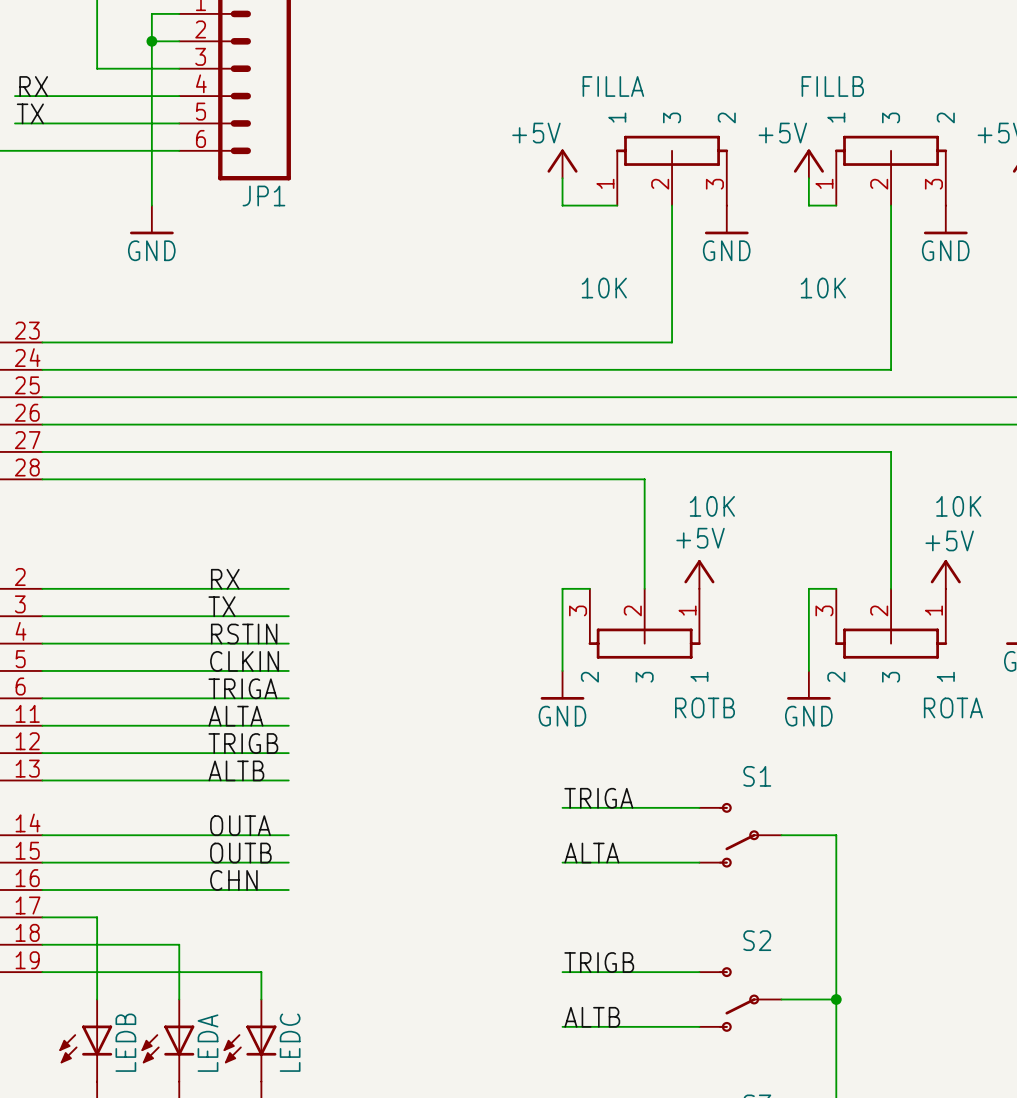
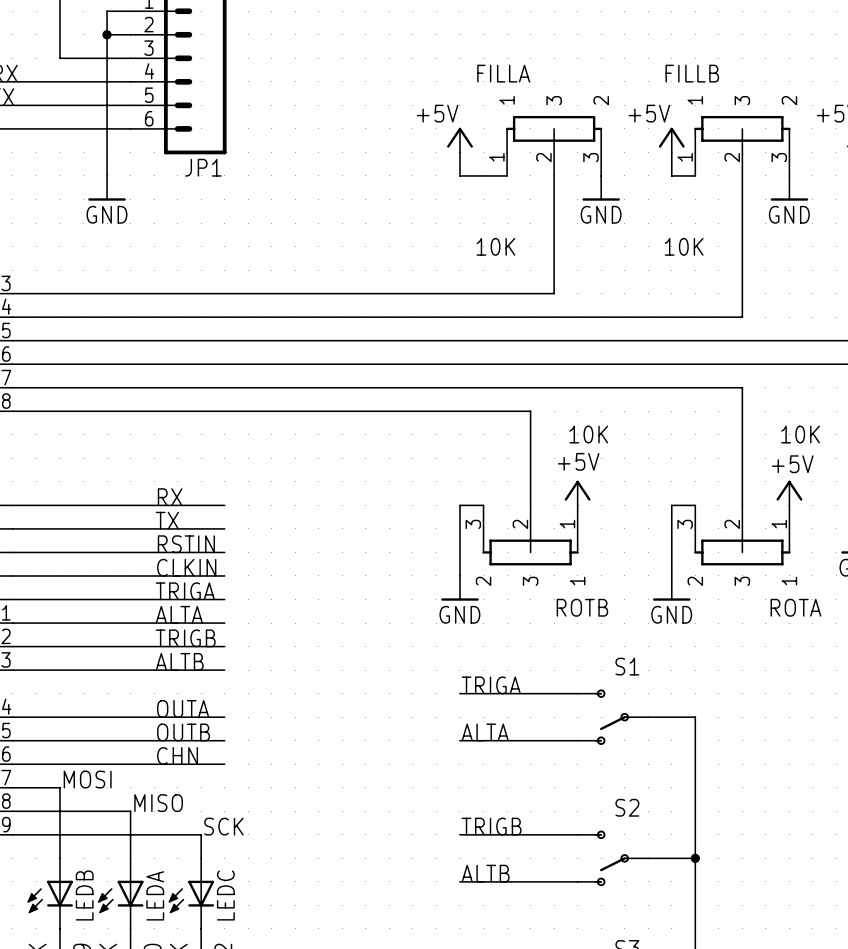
label: none -> MOSI (87, 779)
label: none -> MISO (158, 803)
label: none -> SCK (223, 826)

